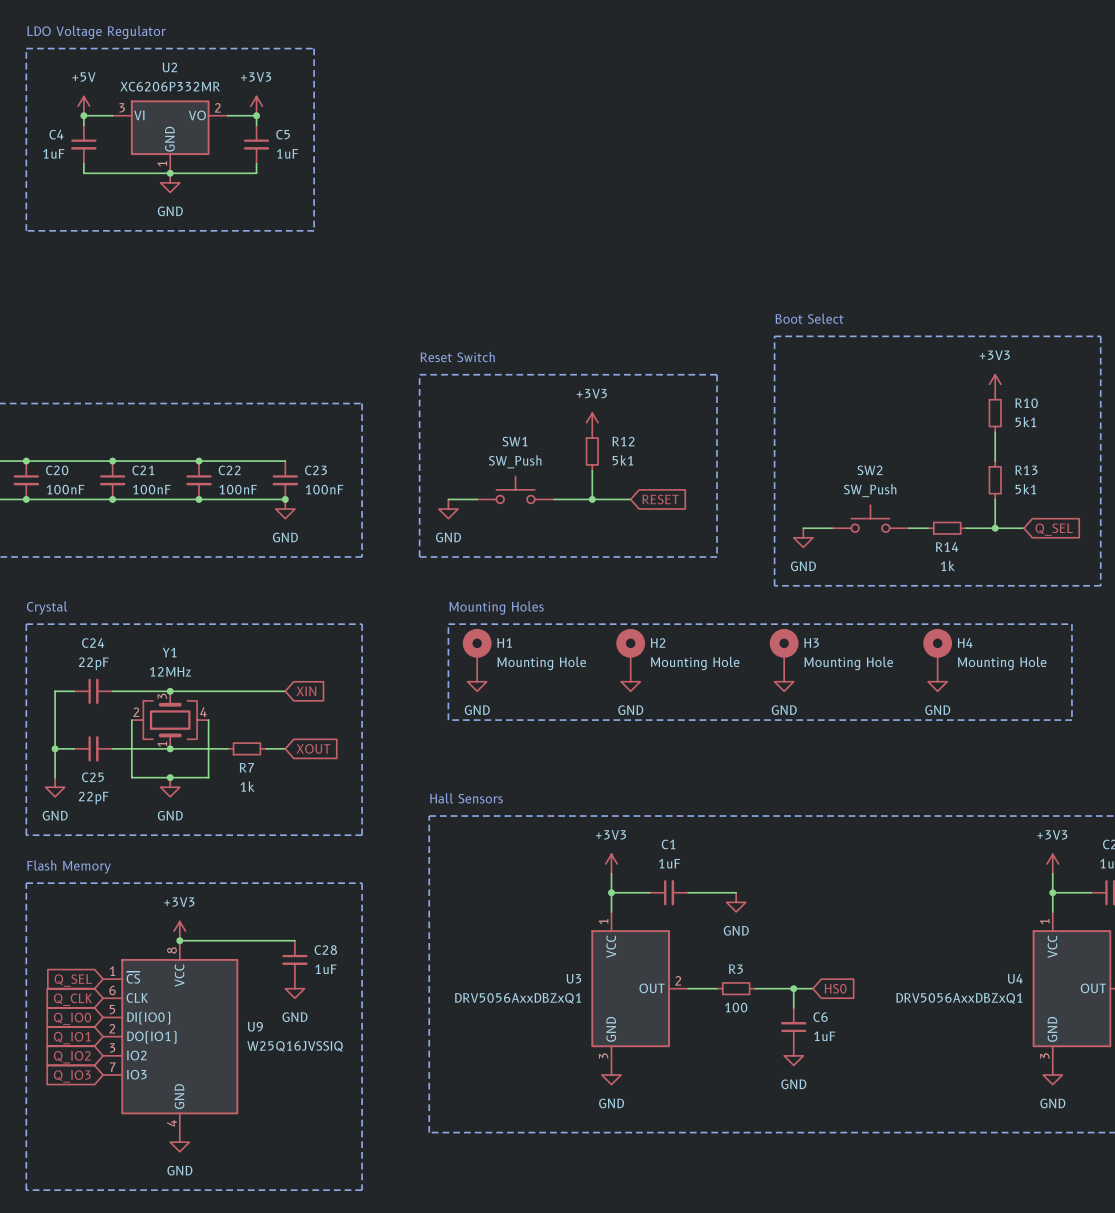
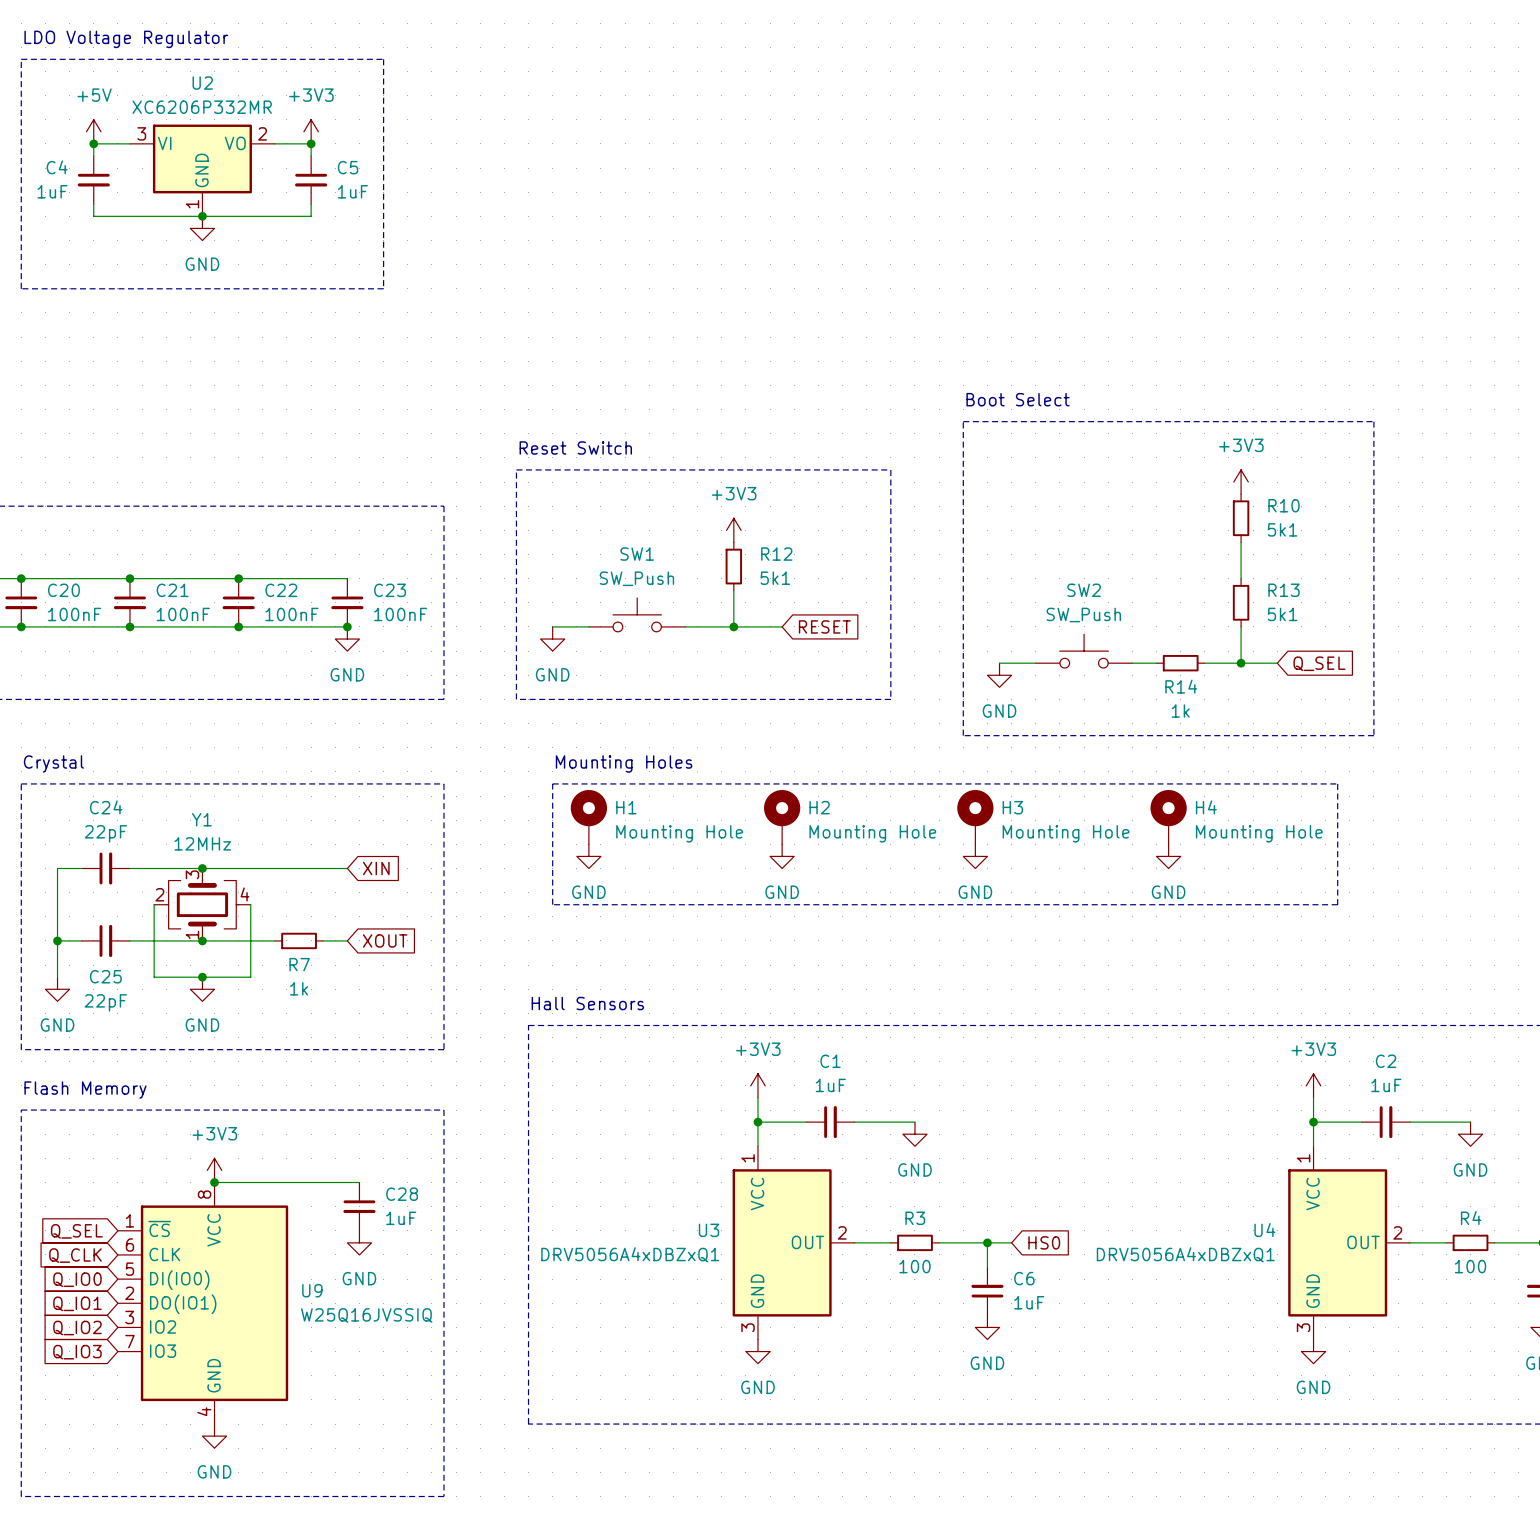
U3 value: DRV5056AxxDBZxQ1 (518, 998) -> DRV5056A4xDBZxQ1 (630, 1254)
U4 value: DRV5056AxxDBZxQ1 (959, 998) -> DRV5056A4xDBZxQ1 (1185, 1254)

